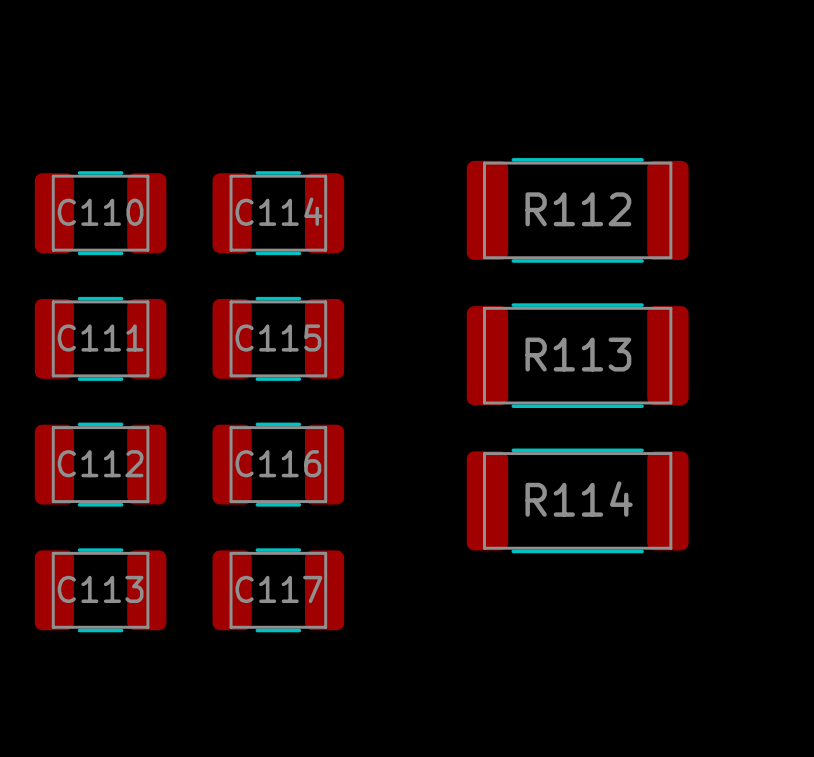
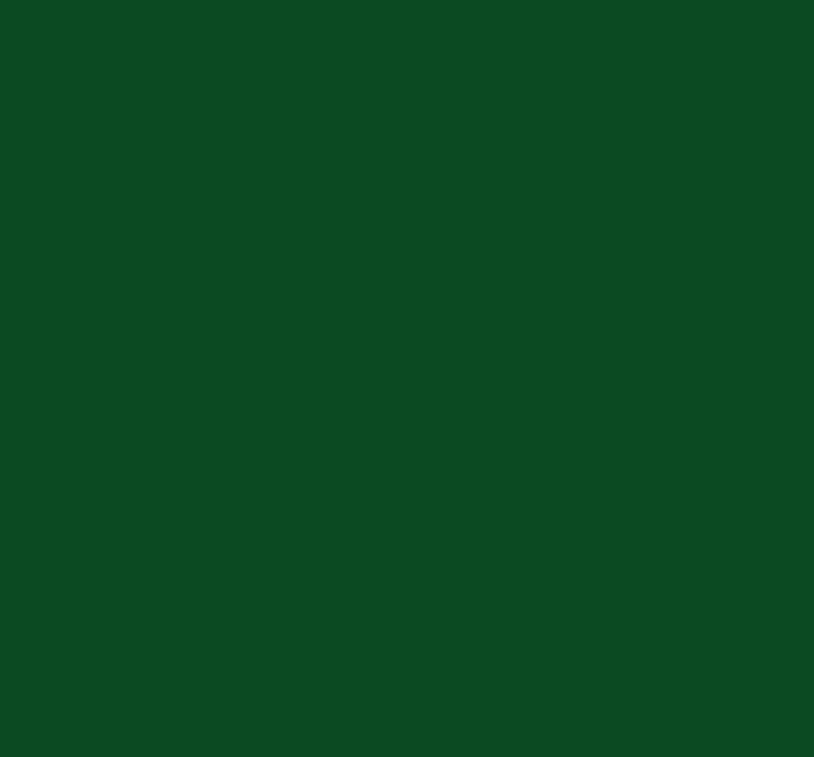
R112: (577, 210) -> none
C110: (100, 213) -> none
C114: (278, 213) -> none
C111: (100, 338) -> none
C115: (278, 338) -> none
R113: (577, 355) -> none
C112: (100, 464) -> none
C116: (278, 464) -> none
R114: (577, 500) -> none
C113: (100, 590) -> none
C117: (278, 590) -> none

